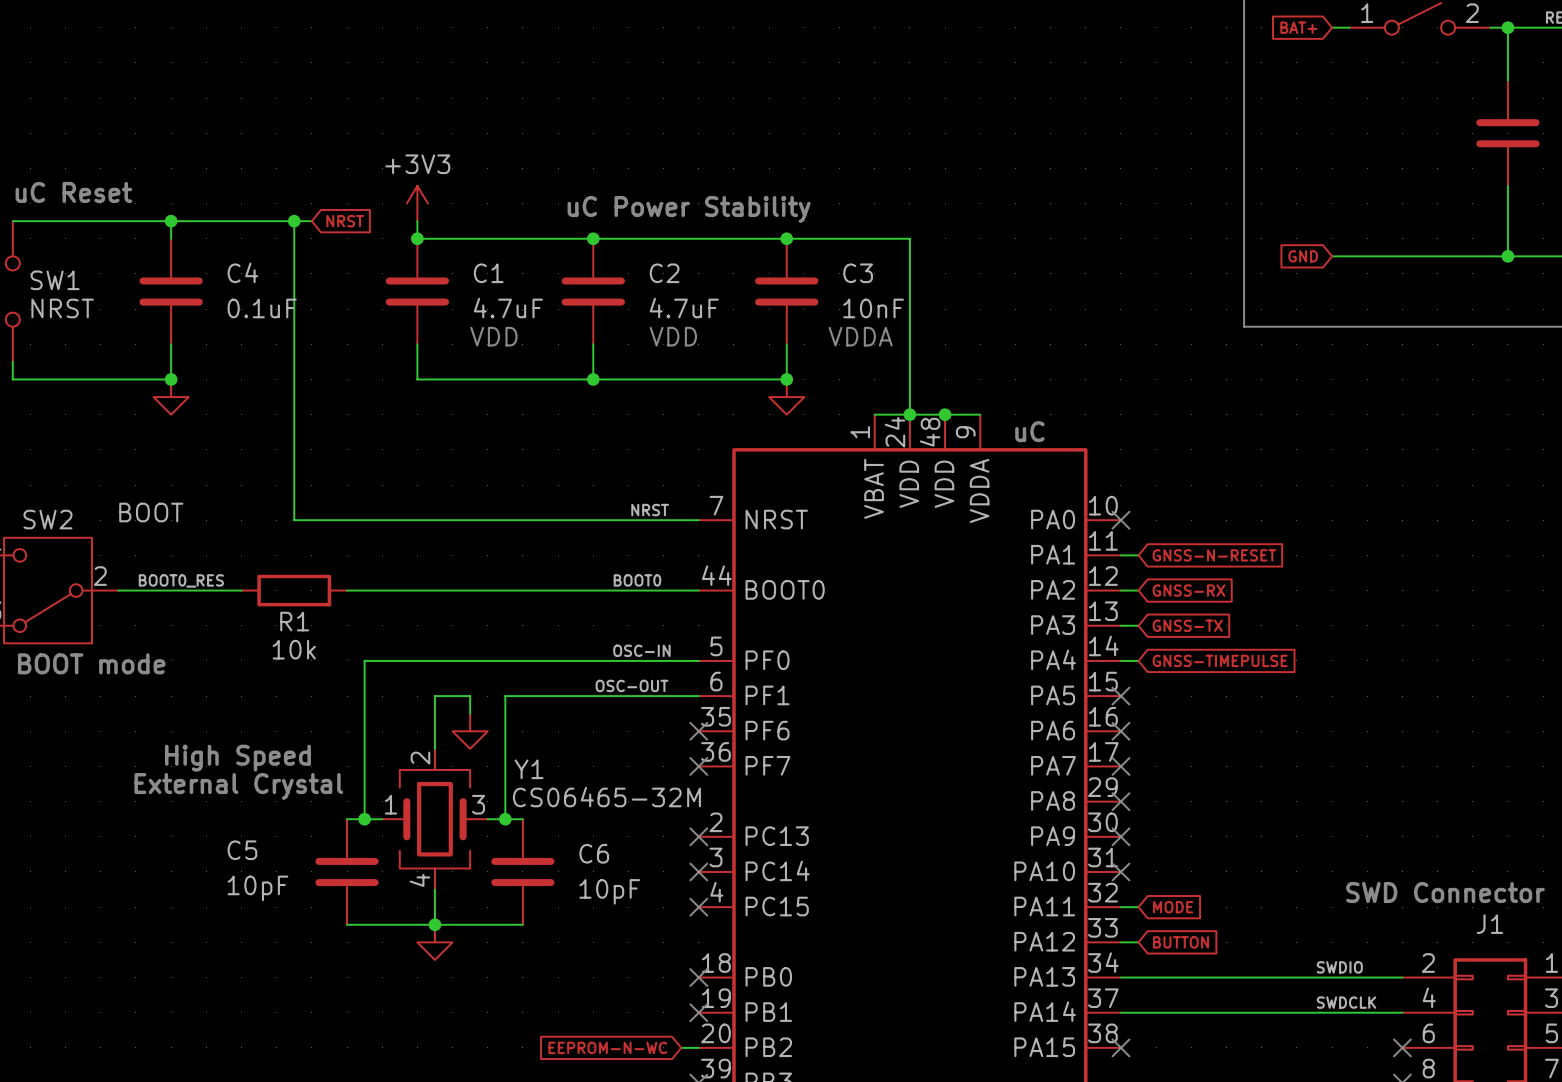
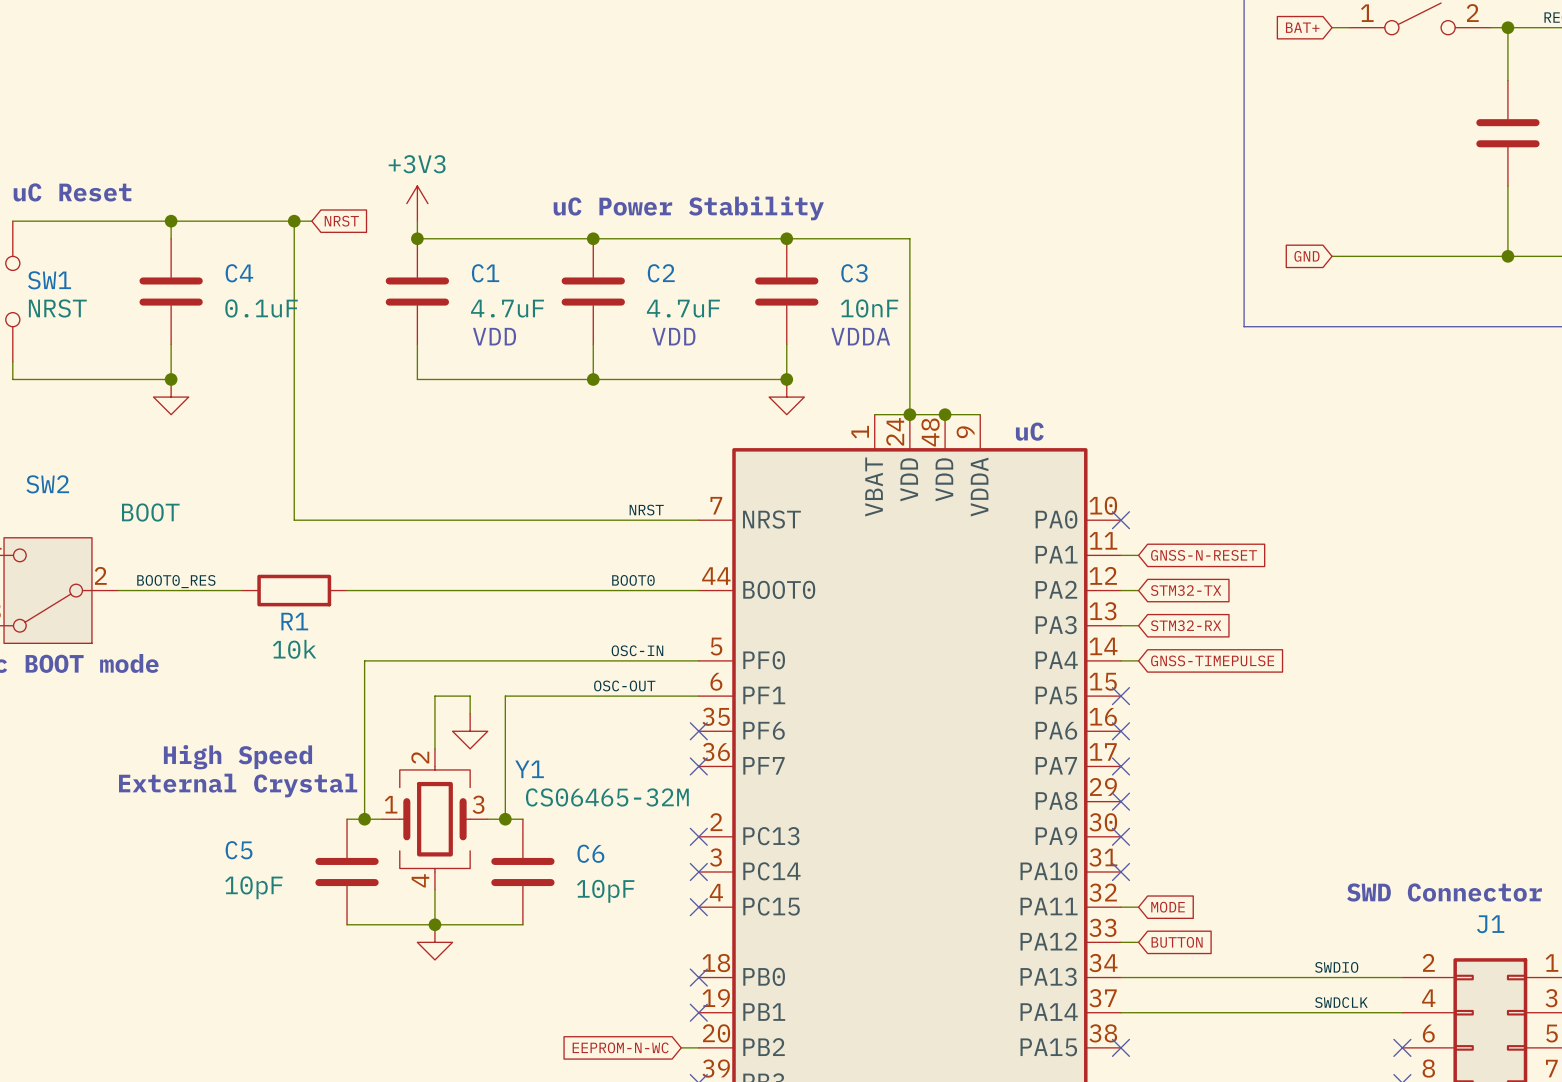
SW2 name position: SW2 (47, 519) -> SW2 (47, 484)
global label: GNSS-RX (1188, 590) -> STM32-TX (1186, 590)
global label: GNSS-TX (1187, 625) -> STM32-RX (1186, 625)

